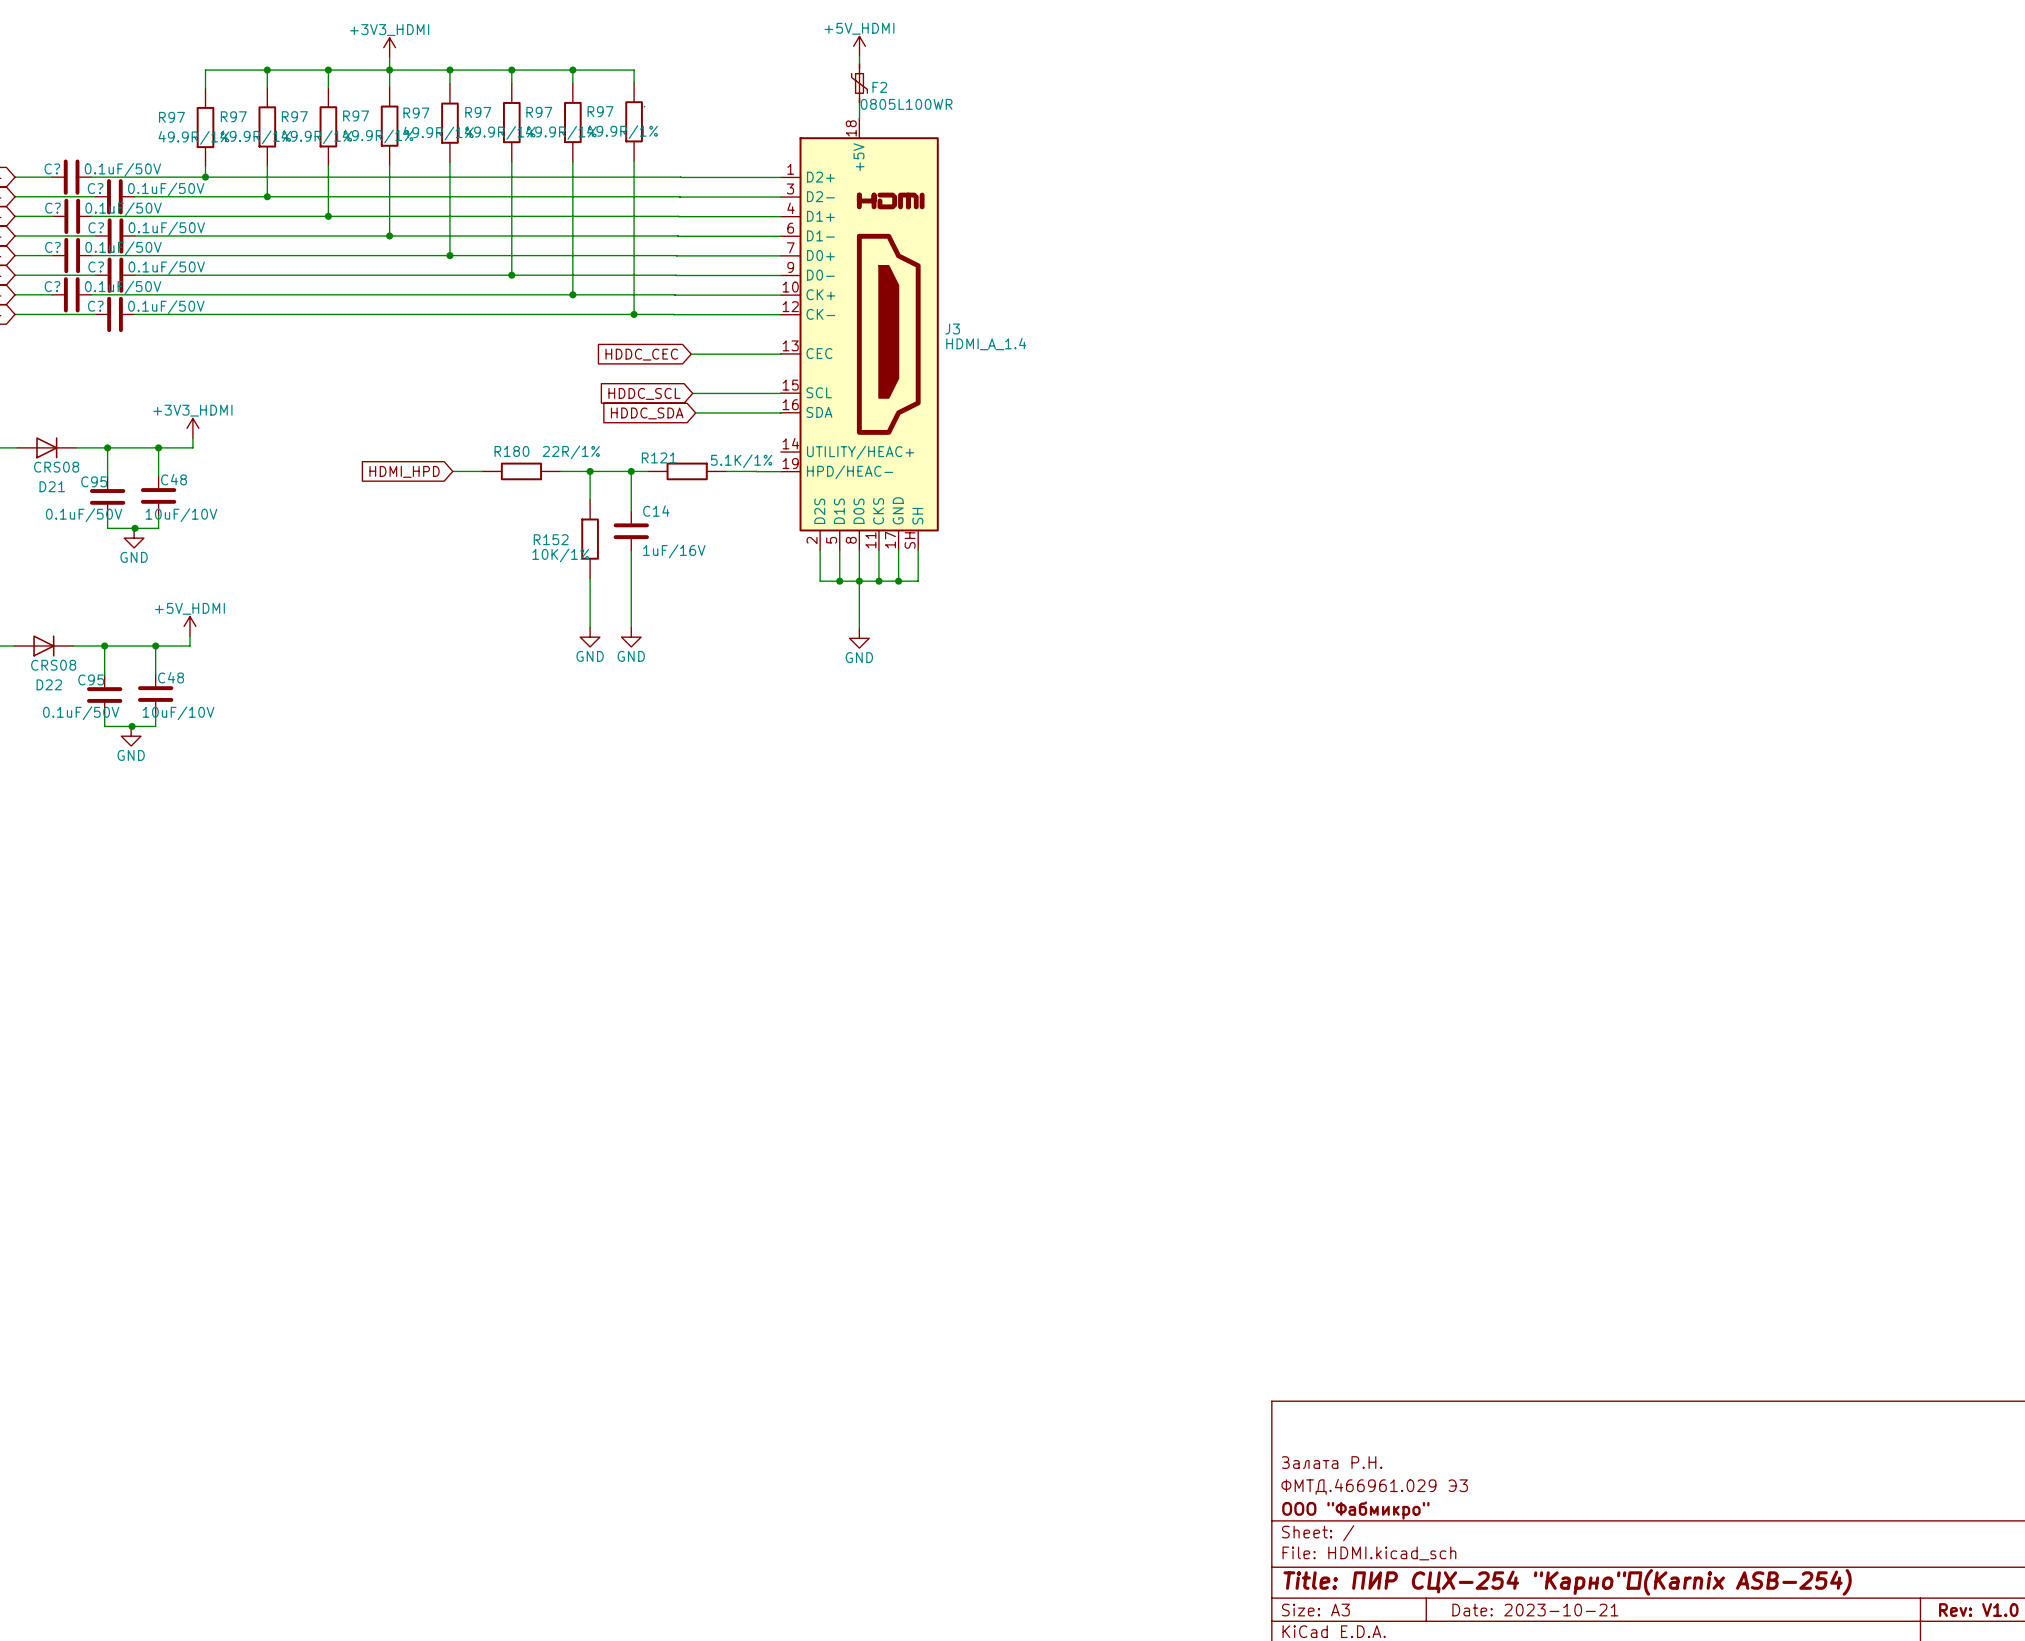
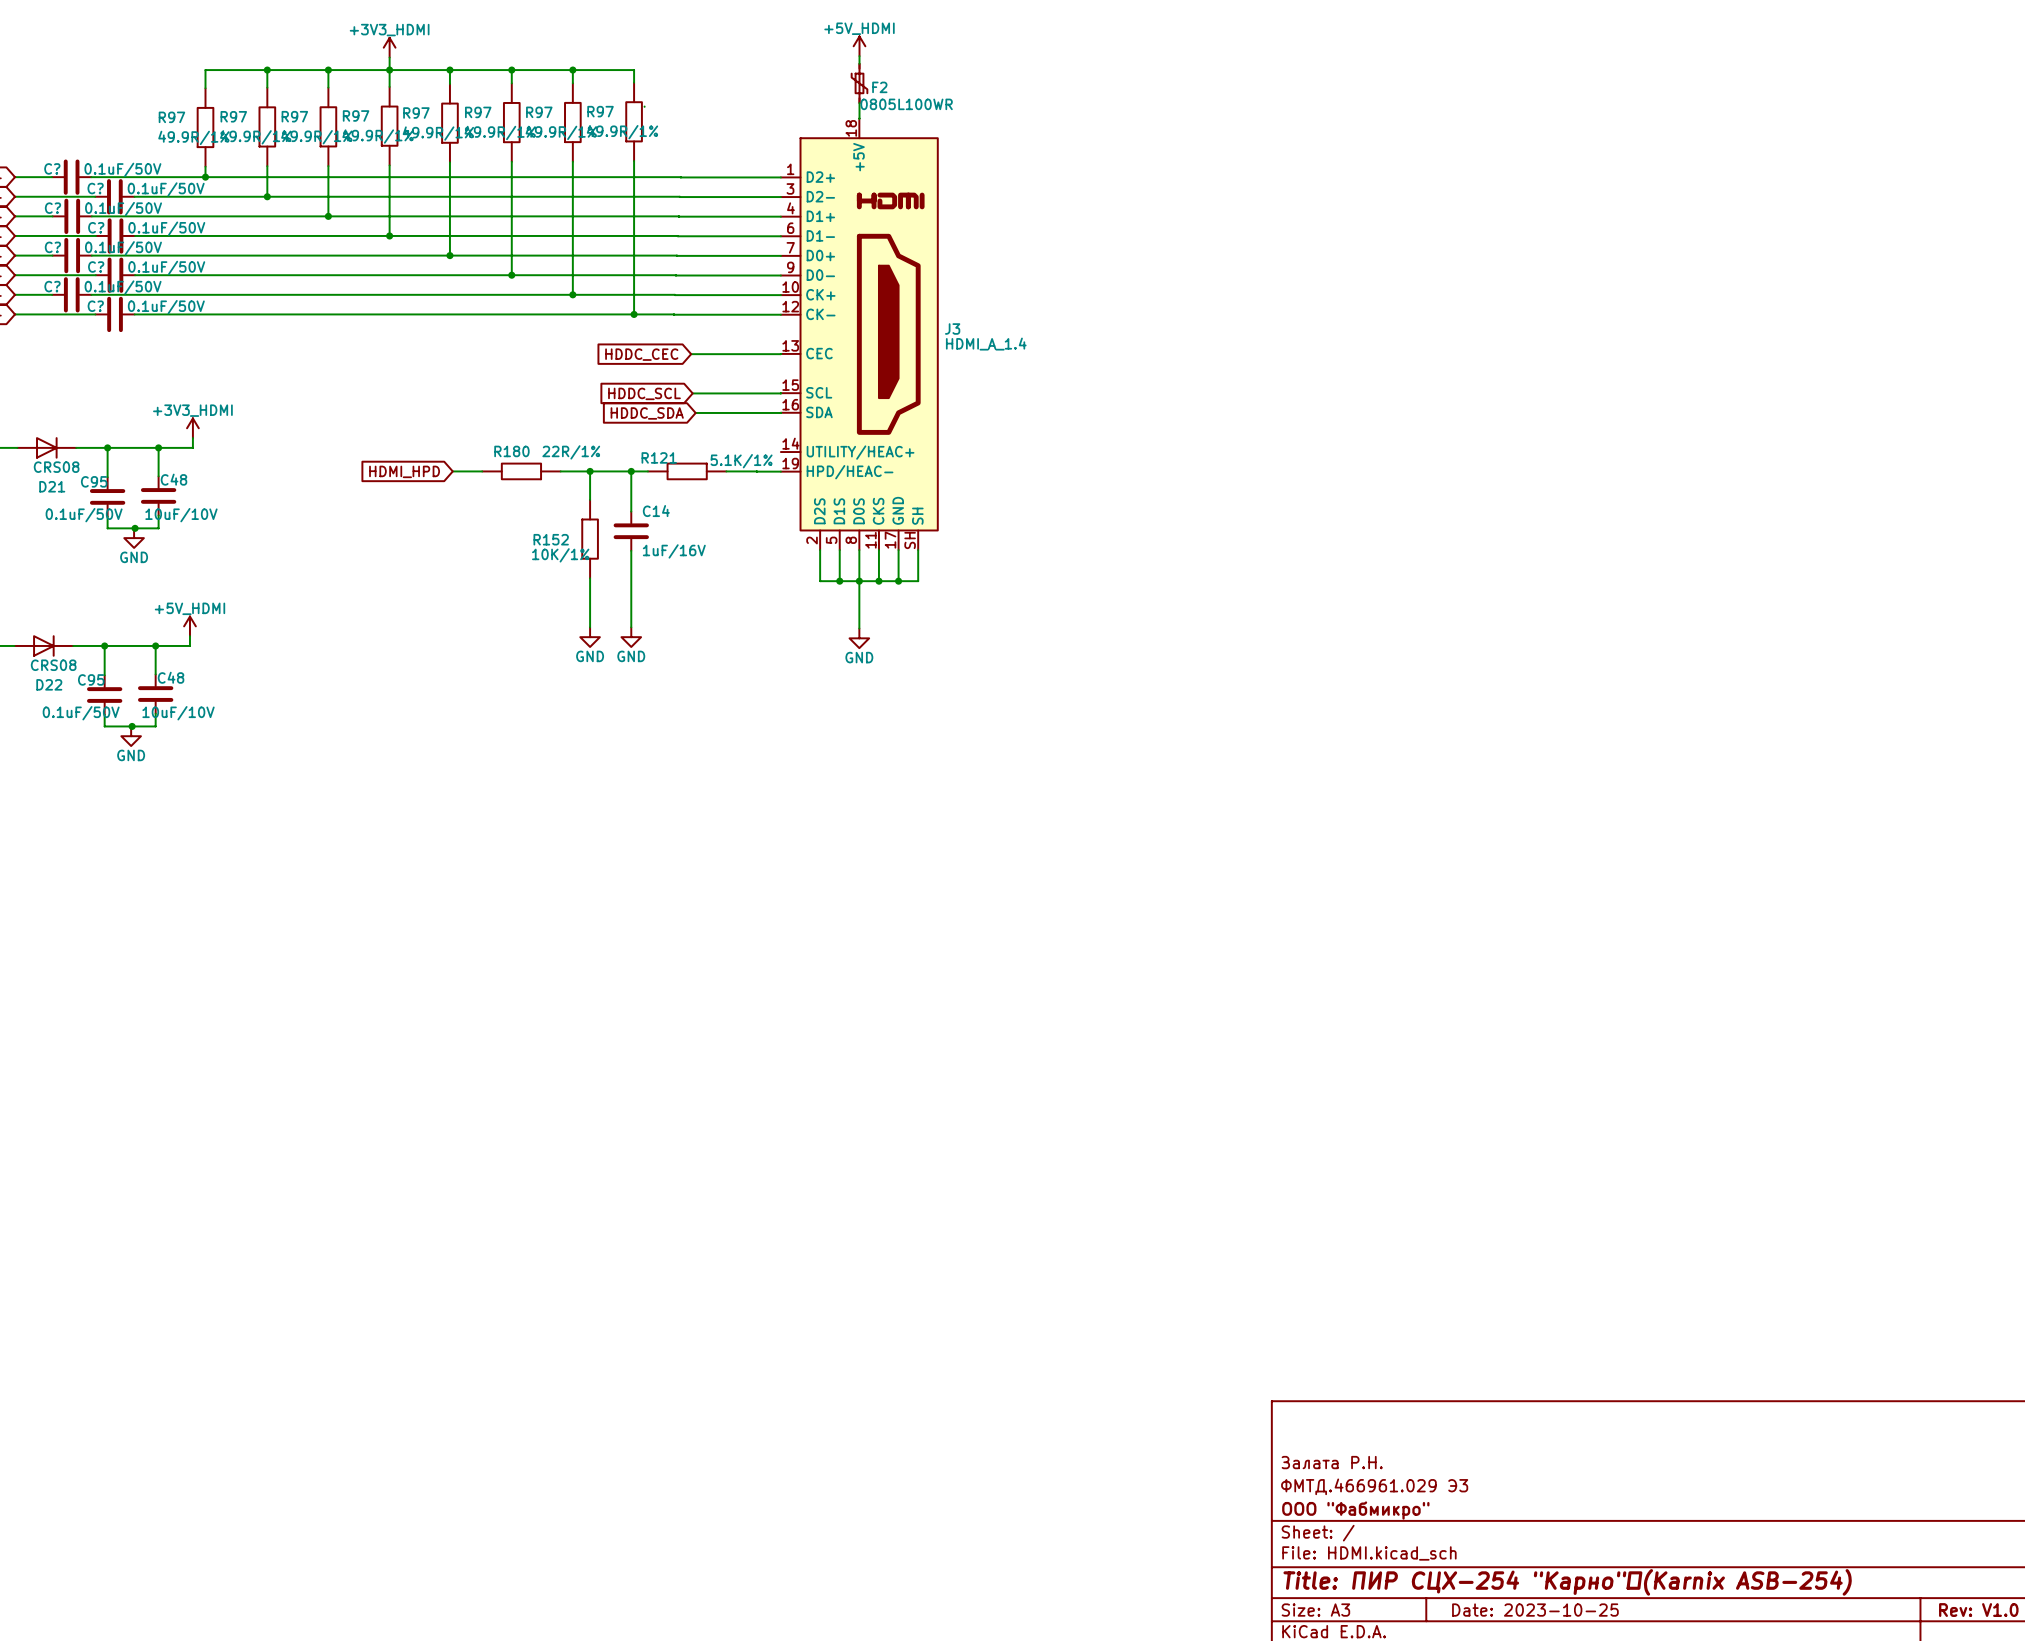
title block: Date: 2023-10-21 (1535, 1610) -> Date: 2023-10-25 (1535, 1610)

